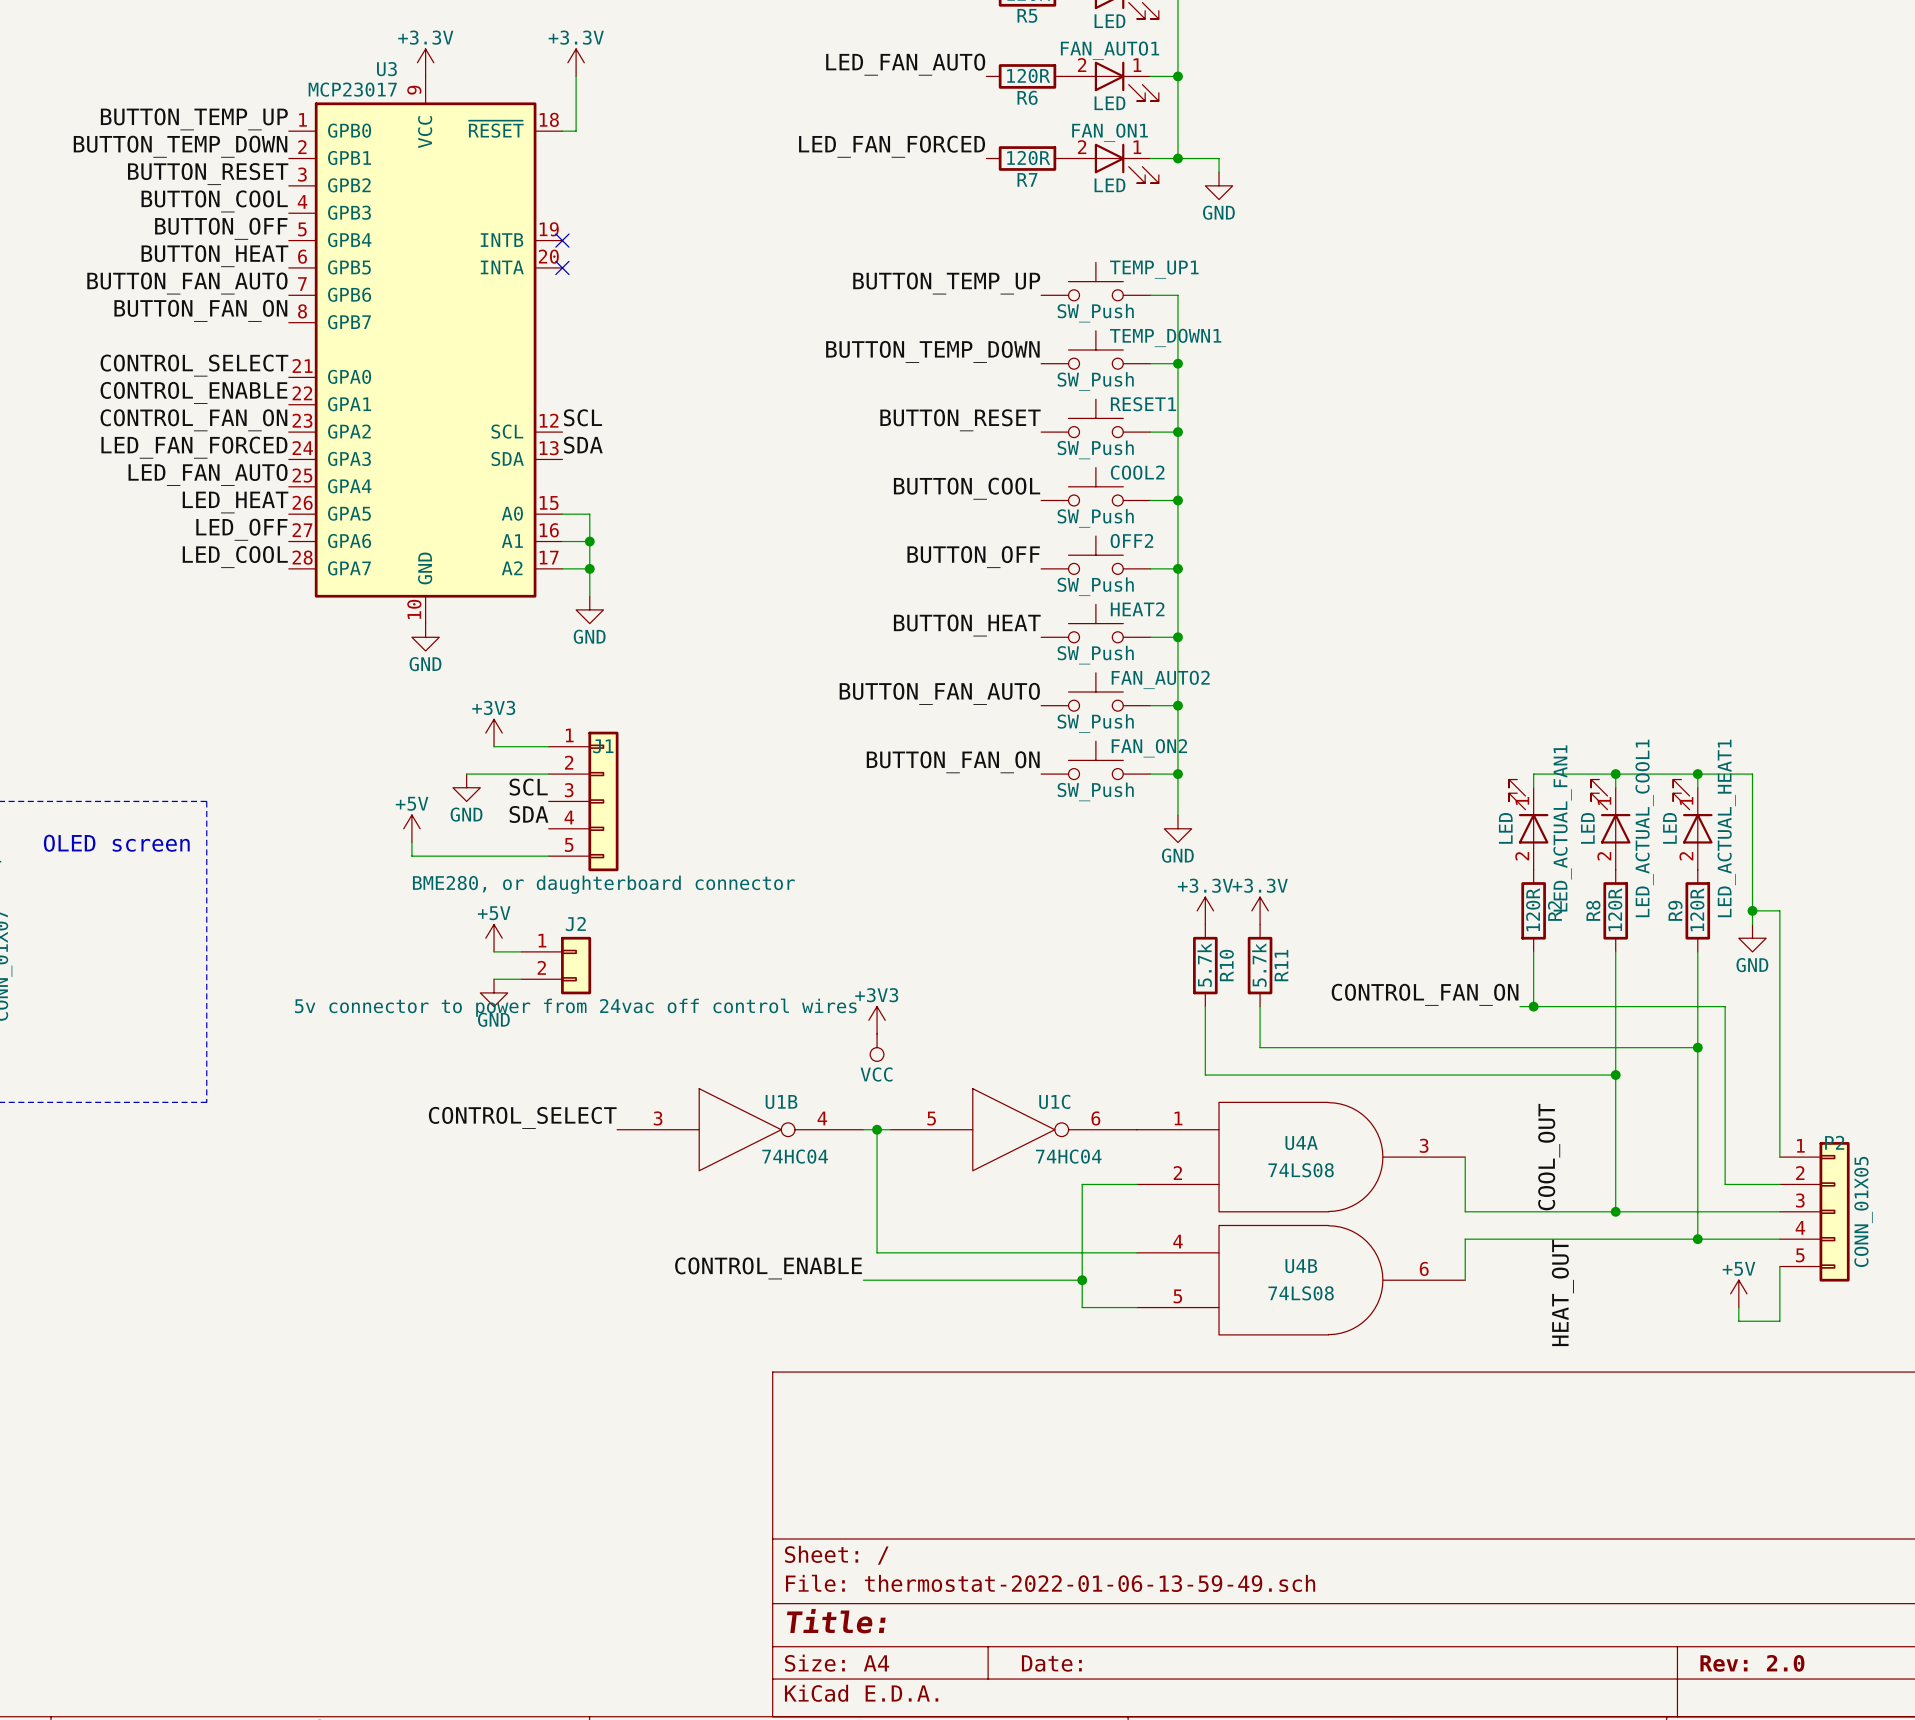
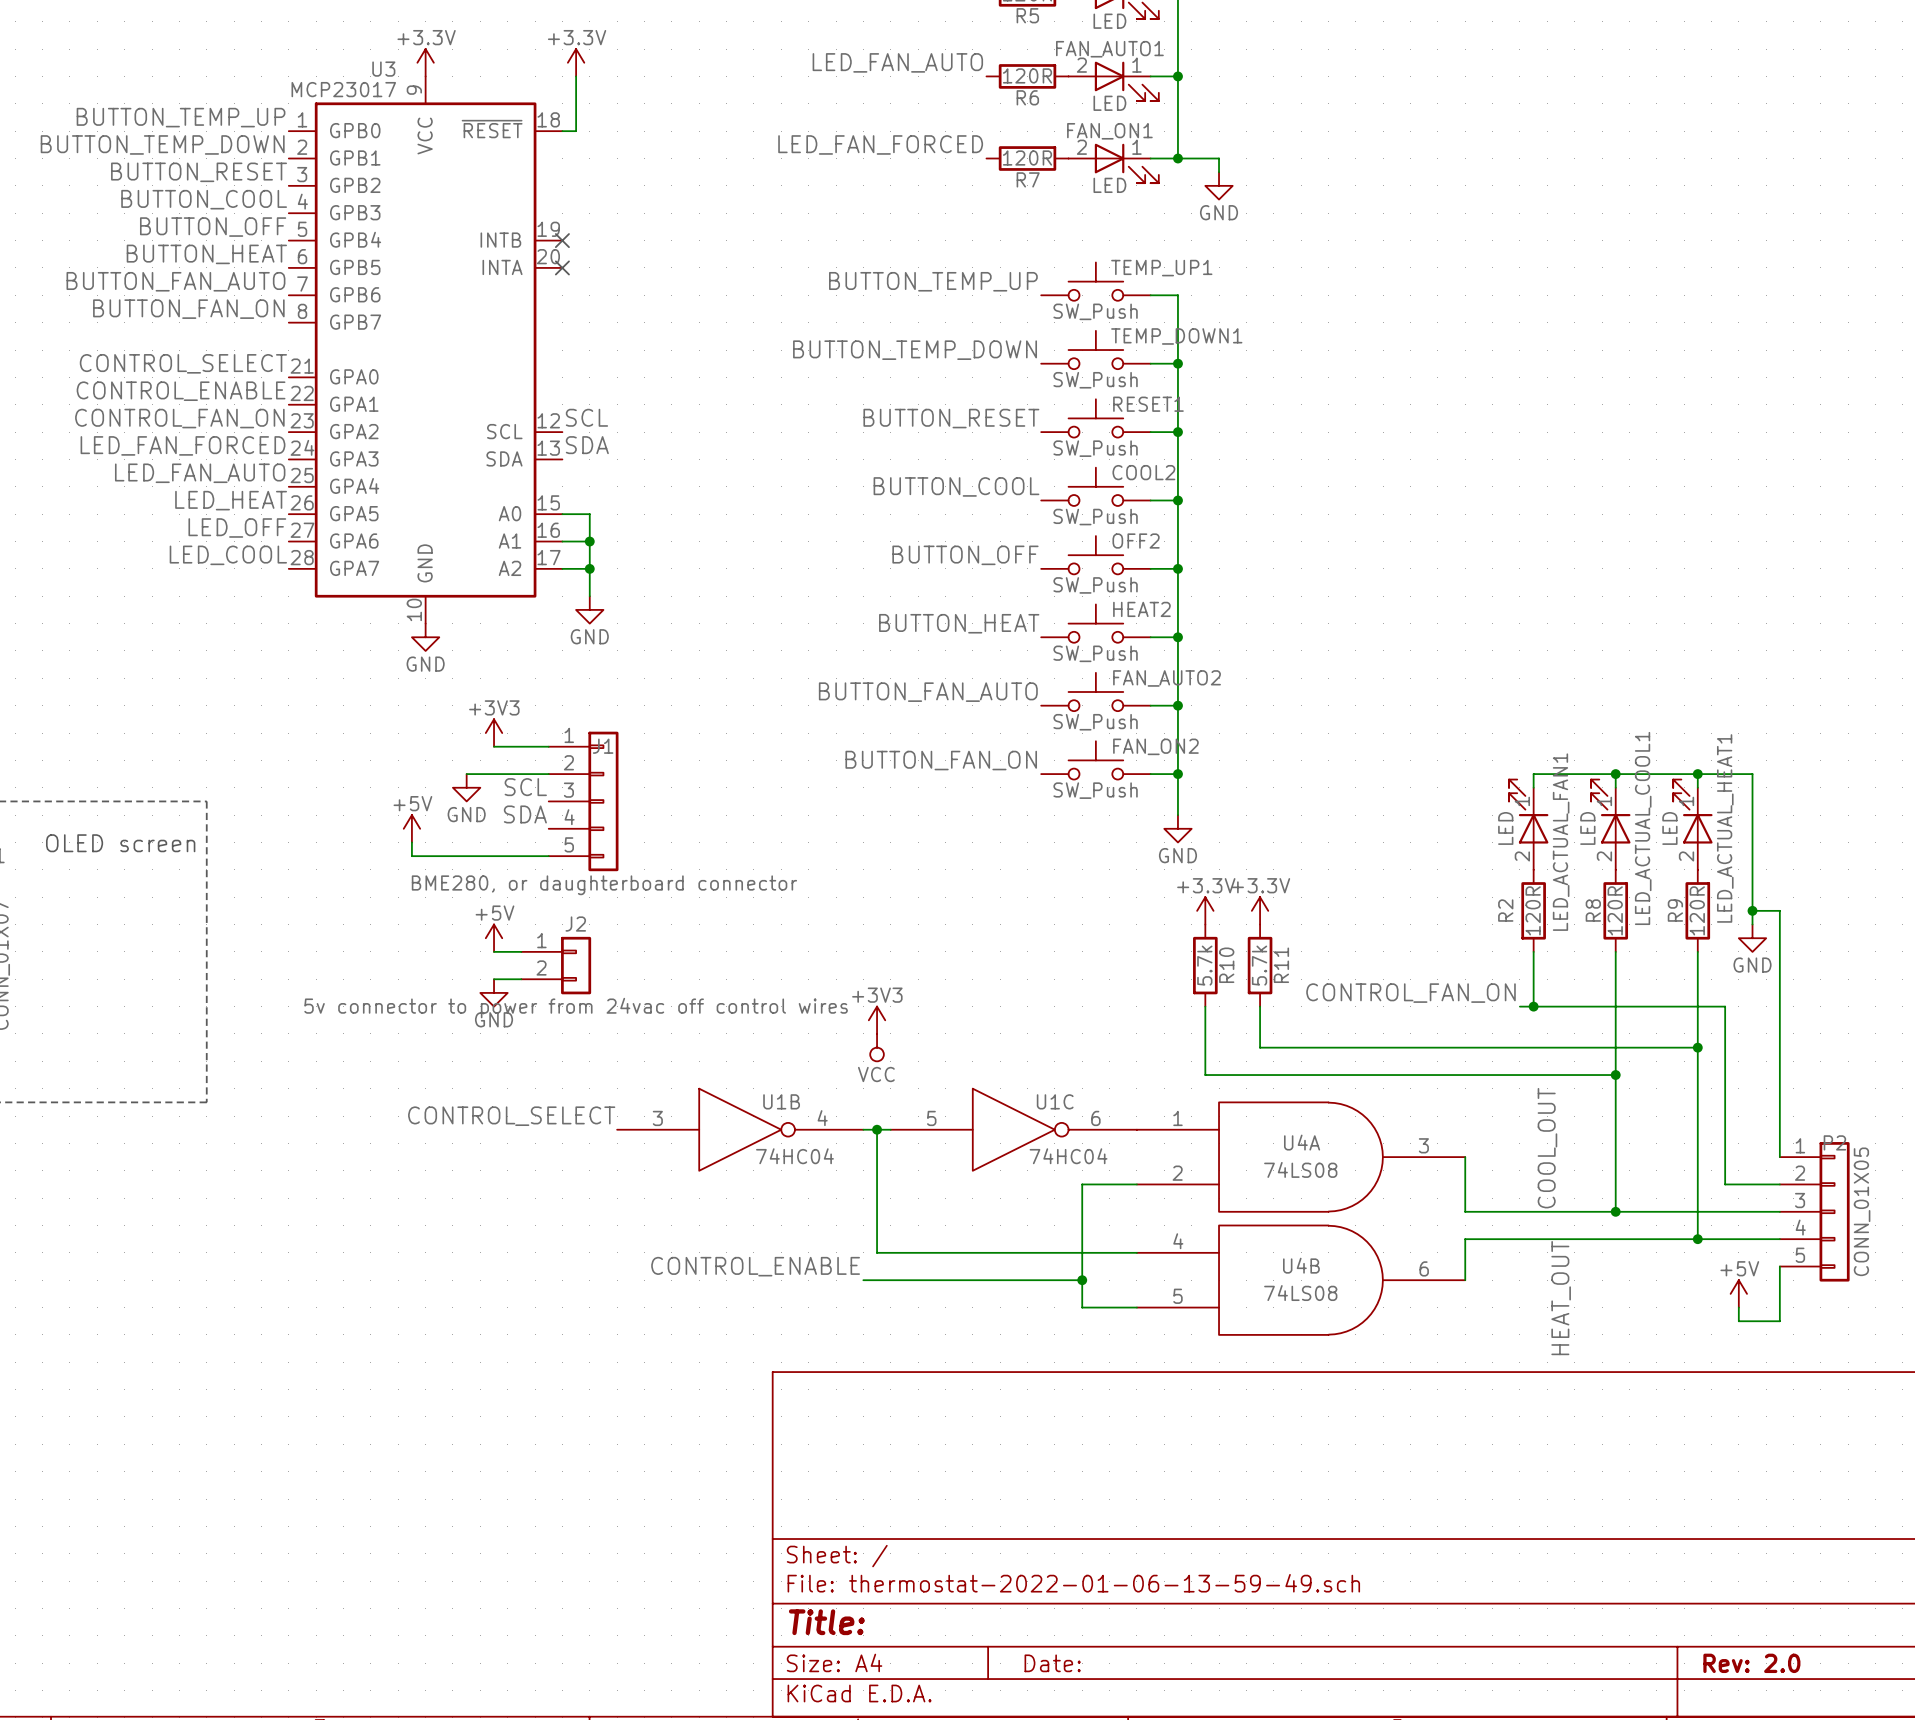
LED_ACTUAL_FAN1 name position: LED_ACTUAL_FAN1 (1562, 828) -> LED_ACTUAL_FAN1 (1561, 842)
R2 name position: R2 (1554, 911) -> R2 (1505, 910)

